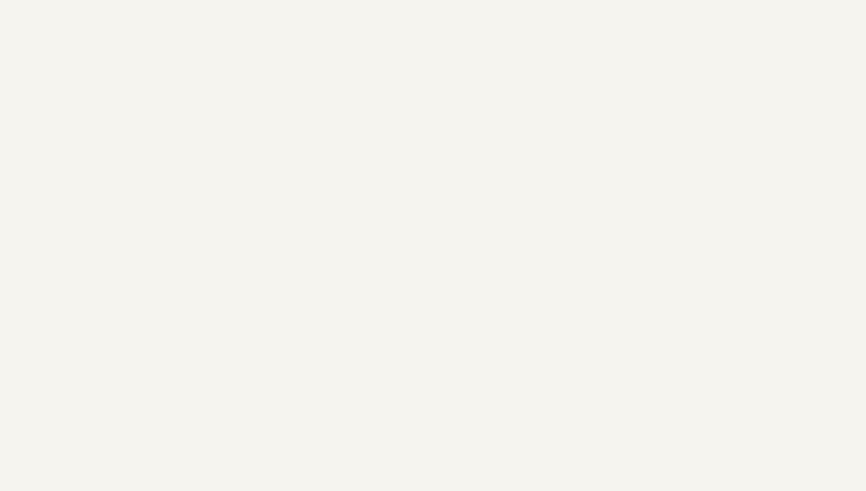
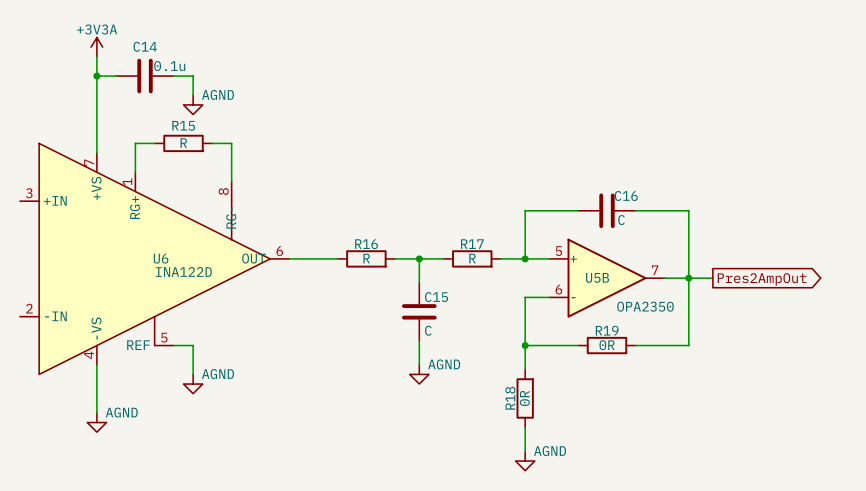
power symbol: none -> +3V3A (96, 47)
wire: none -> (96, 56) (96, 153)
wire: none -> (96, 76) (116, 76)
junction: none -> (96, 76)
C14: none -> 0.1u (145, 76)
wire: none -> (173, 76) (193, 76) (193, 95)
power symbol: none -> AGND (193, 104)
wire: none -> (154, 143) (135, 143) (135, 172)
R15: none -> R (183, 143)
wire: none -> (212, 143) (231, 143) (231, 181)
wire: none -> (578, 210) (525, 210) (525, 258)
C16: none -> C (606, 210)
wire: none -> (635, 210) (688, 210) (688, 345) (635, 345)
U6: none -> INA122D (154, 258)
wire: none -> (289, 258) (337, 258)
R16: none -> R (366, 258)
wire: none -> (395, 258) (443, 258)
wire: none -> (419, 258) (419, 282)
junction: none -> (419, 258)
R17: none -> R (472, 258)
wire: none -> (501, 258) (549, 258)
junction: none -> (525, 258)
U5B: none -> OPA2350 (606, 278)
wire: none -> (664, 278) (712, 278)
junction: none -> (688, 278)
global label: none -> Pres2AmpOut (762, 279)
wire: none -> (549, 297) (525, 297) (525, 369)
C15: none -> C (419, 311)
wire: none -> (419, 340) (419, 364)
wire: none -> (173, 345) (193, 345) (193, 374)
wire: none -> (525, 345) (578, 345)
junction: none -> (525, 345)
R19: none -> 0R (606, 345)
wire: none -> (96, 364) (96, 412)
power symbol: none -> AGND (419, 374)
power symbol: none -> AGND (193, 384)
R18: none -> 0R (525, 398)
power symbol: none -> AGND (96, 422)
wire: none -> (525, 427) (525, 451)
power symbol: none -> AGND (525, 461)

